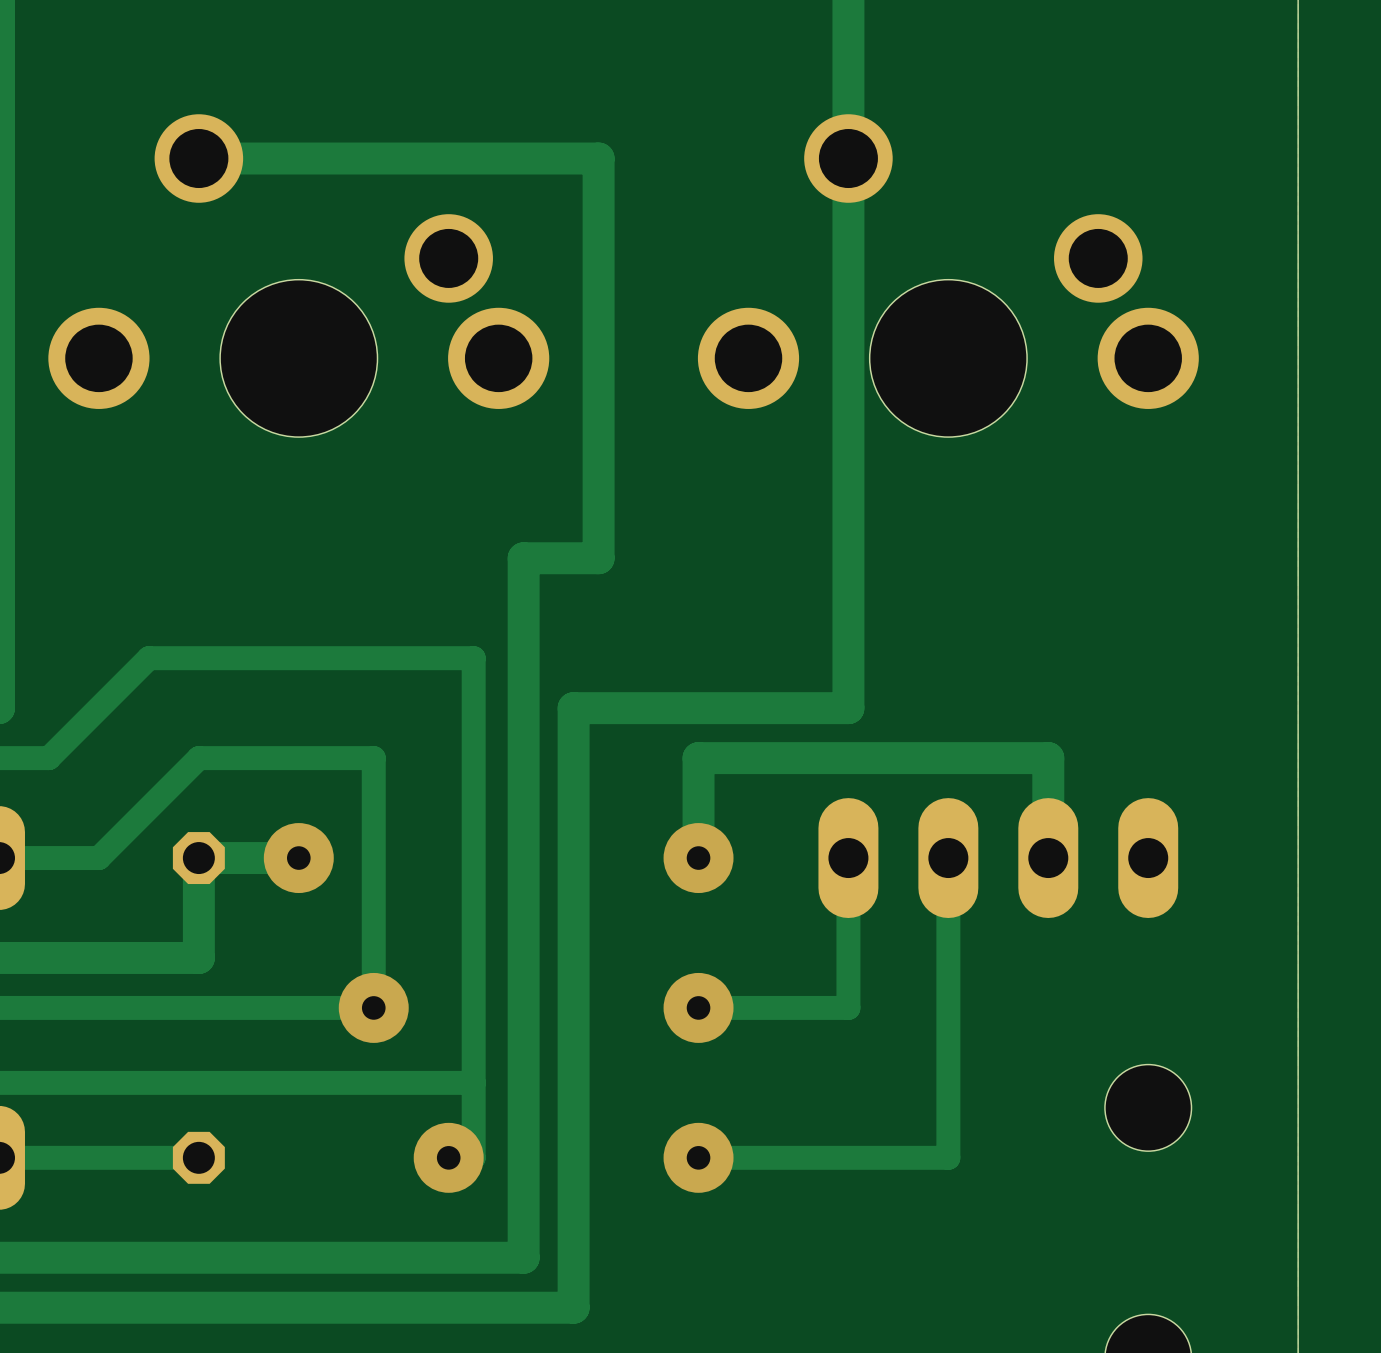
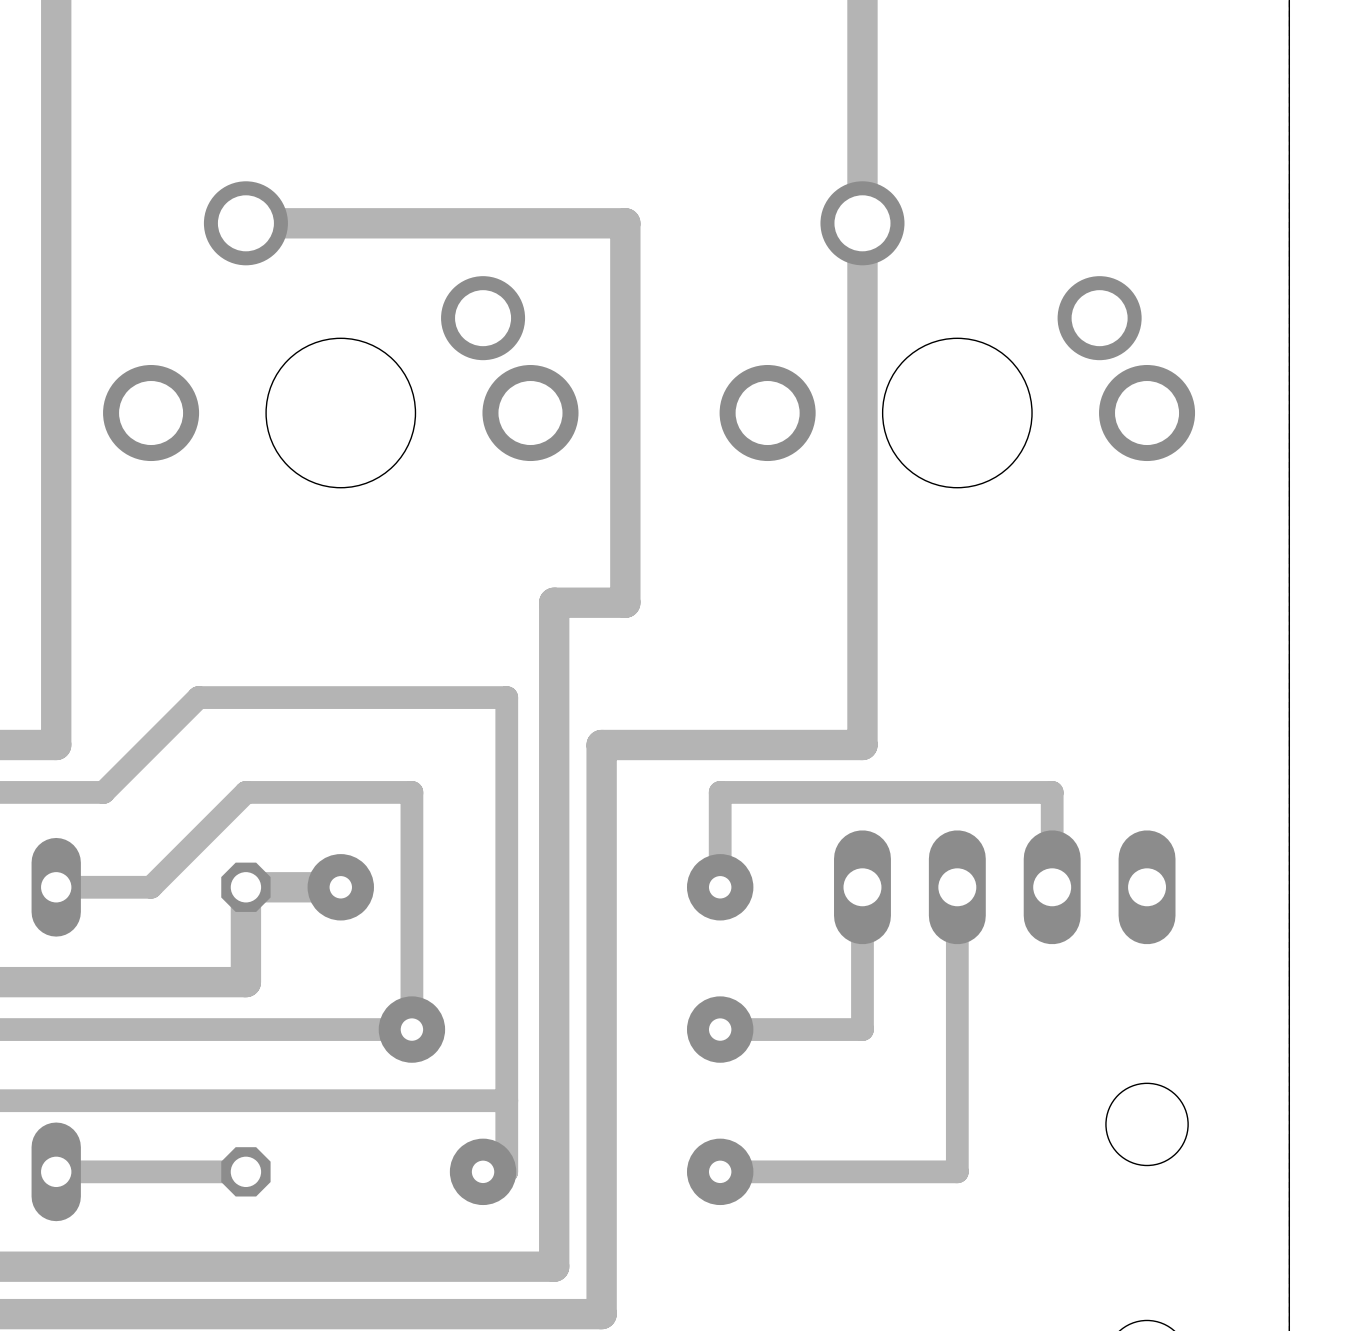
track width: thick (1048, 858) (1048, 758) (698, 758) (698, 858) -> thin (1052, 887) (1052, 792) (720, 792) (720, 887)

